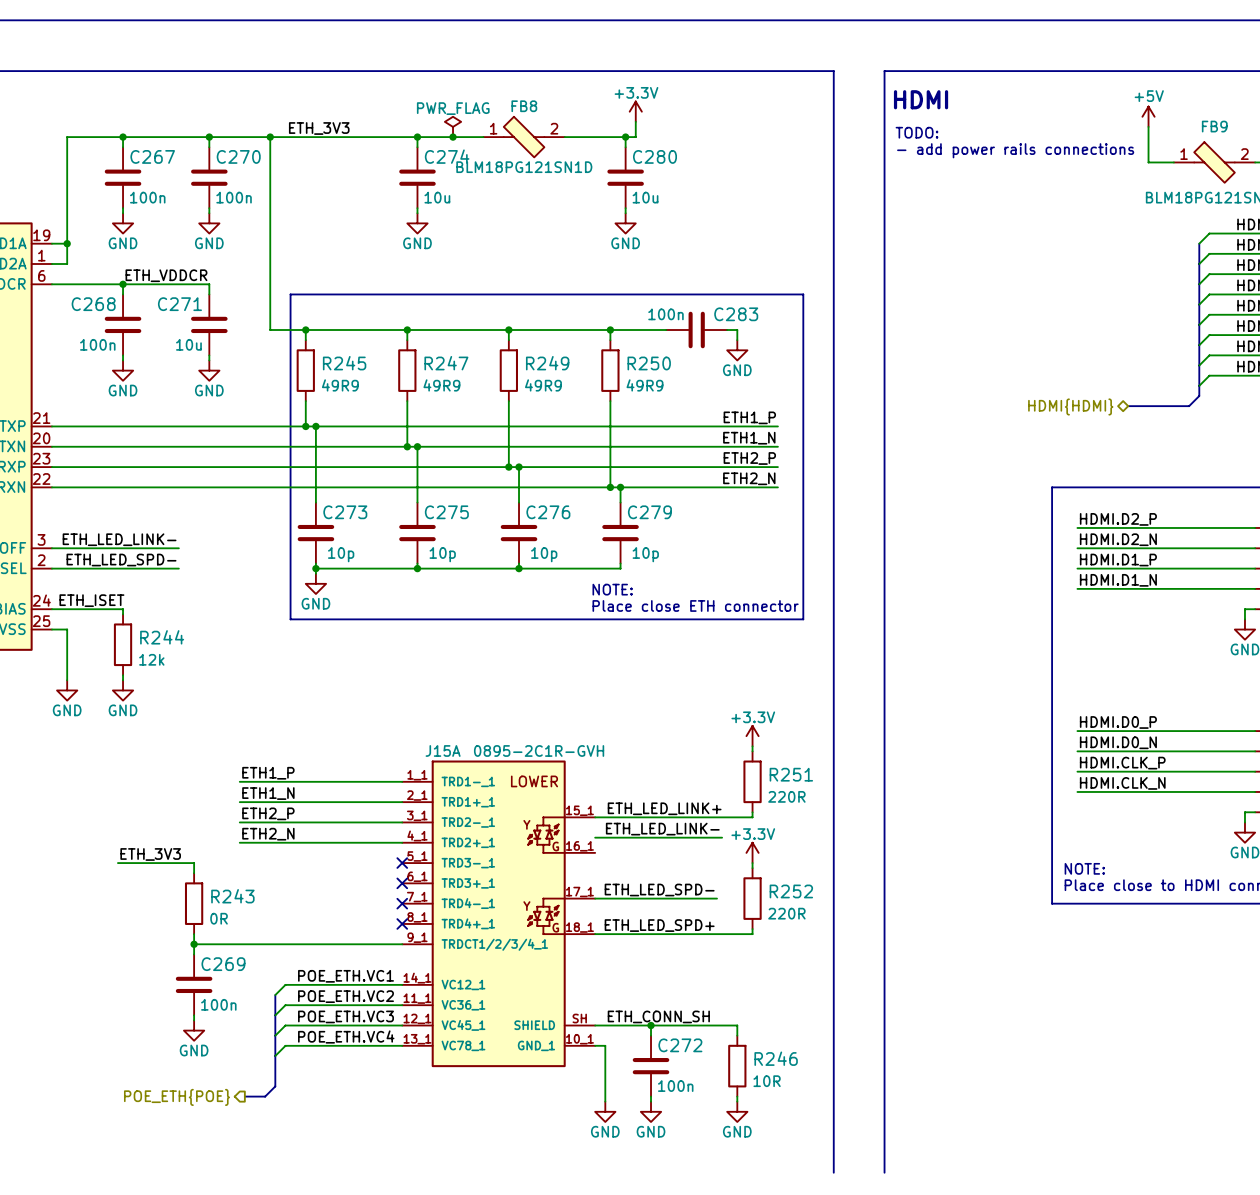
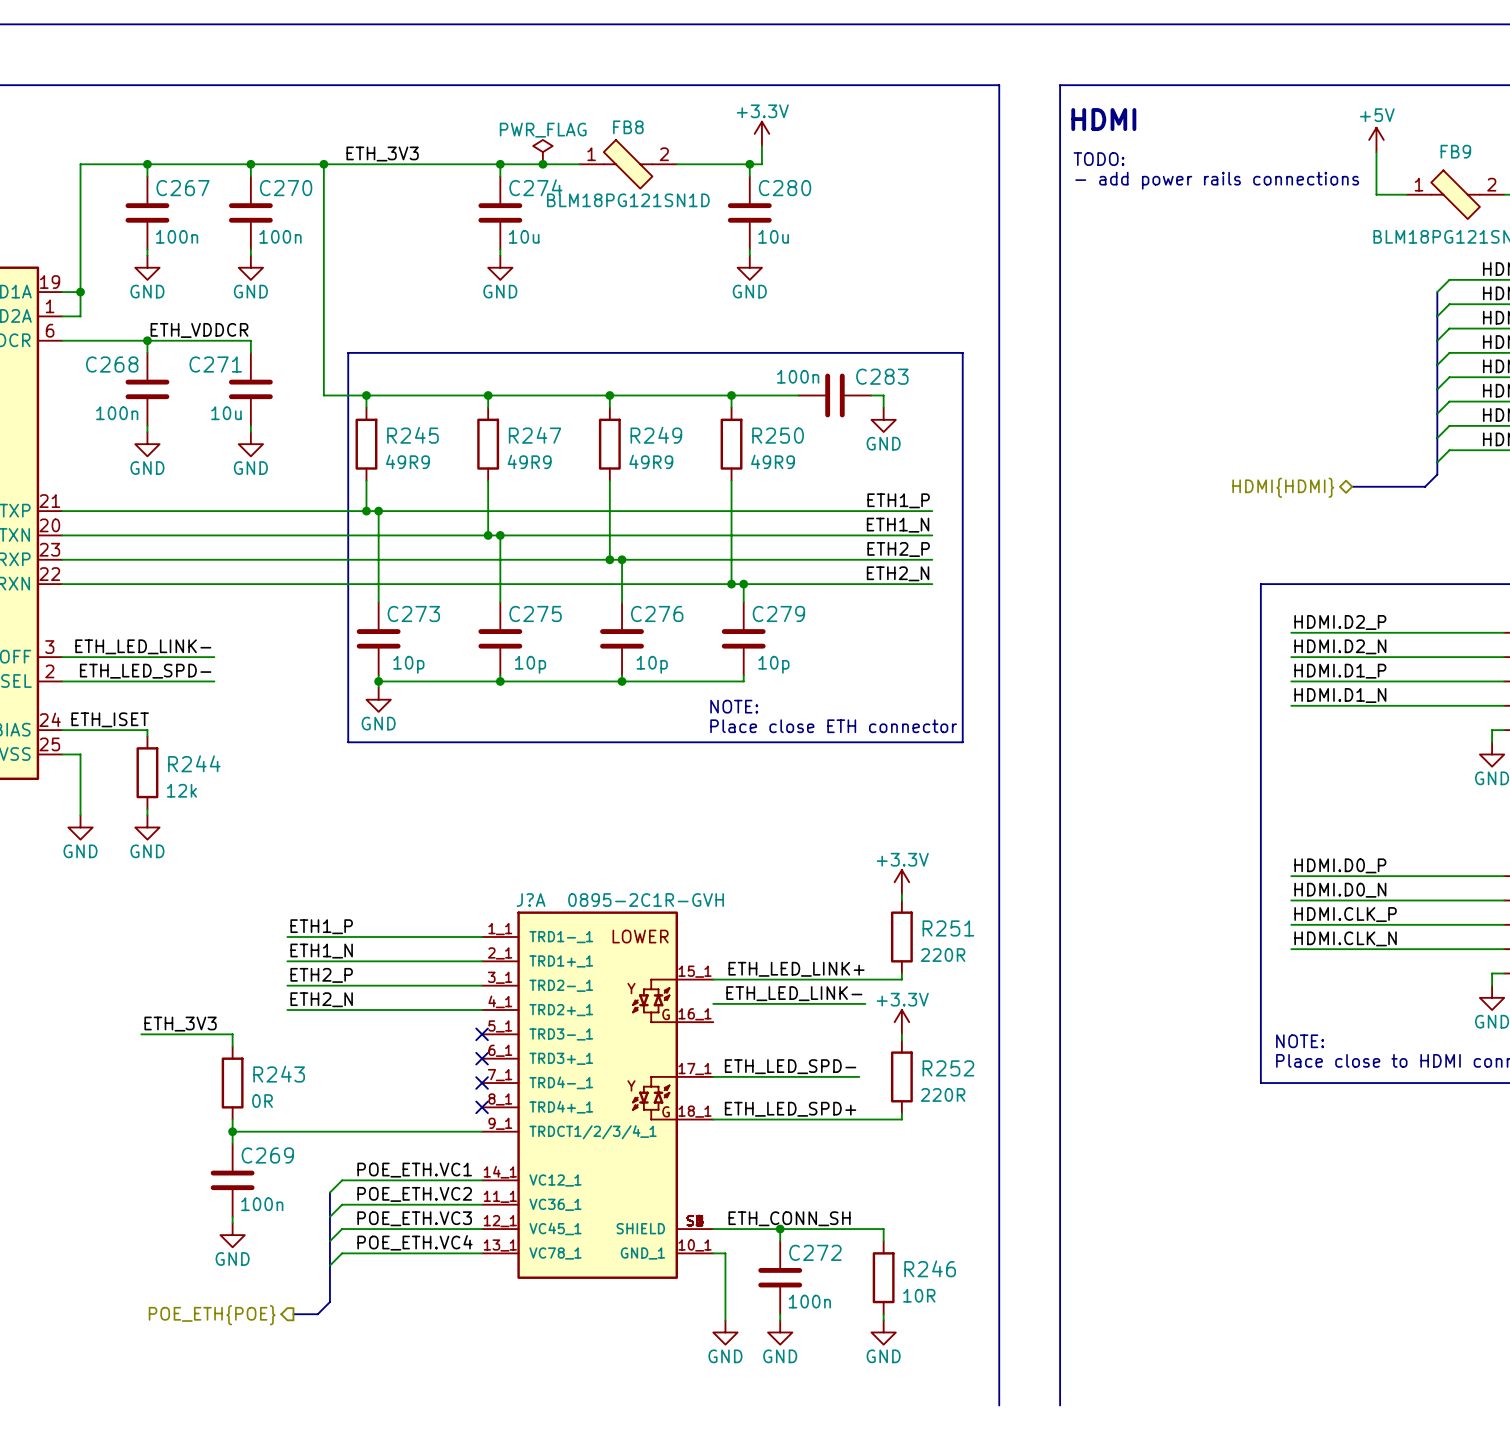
J15A name: J15A (443, 750) -> J?A (531, 900)
J15A symbol: [402, 760, 596, 1068] -> [482, 911, 714, 1279]

